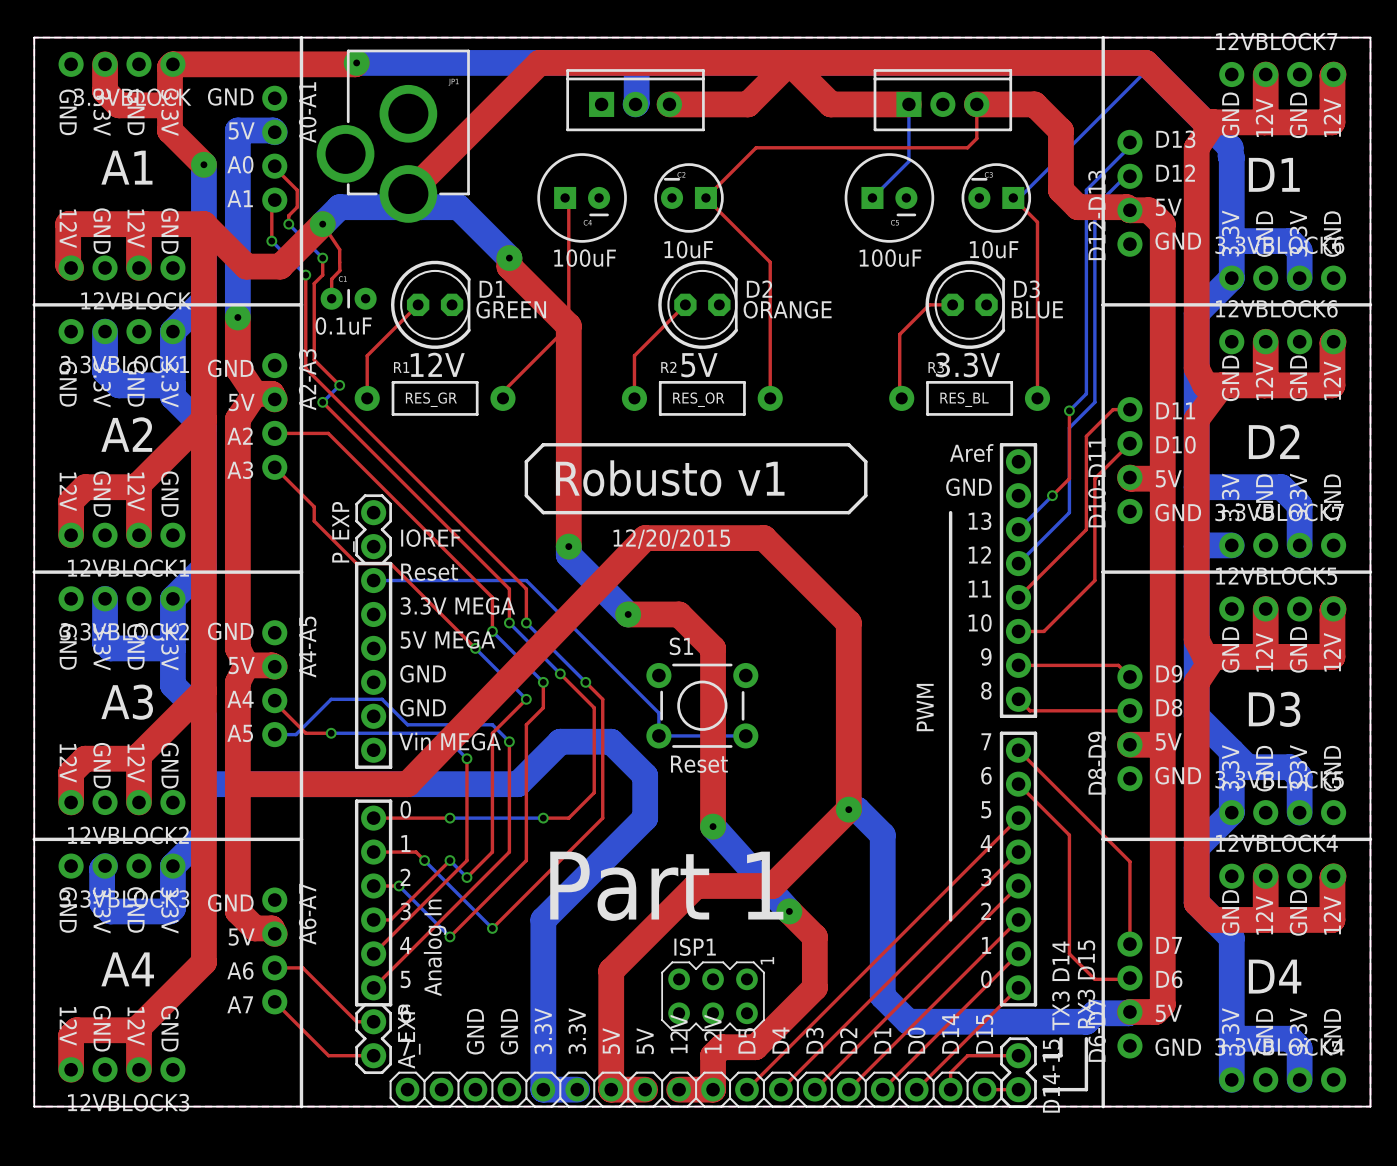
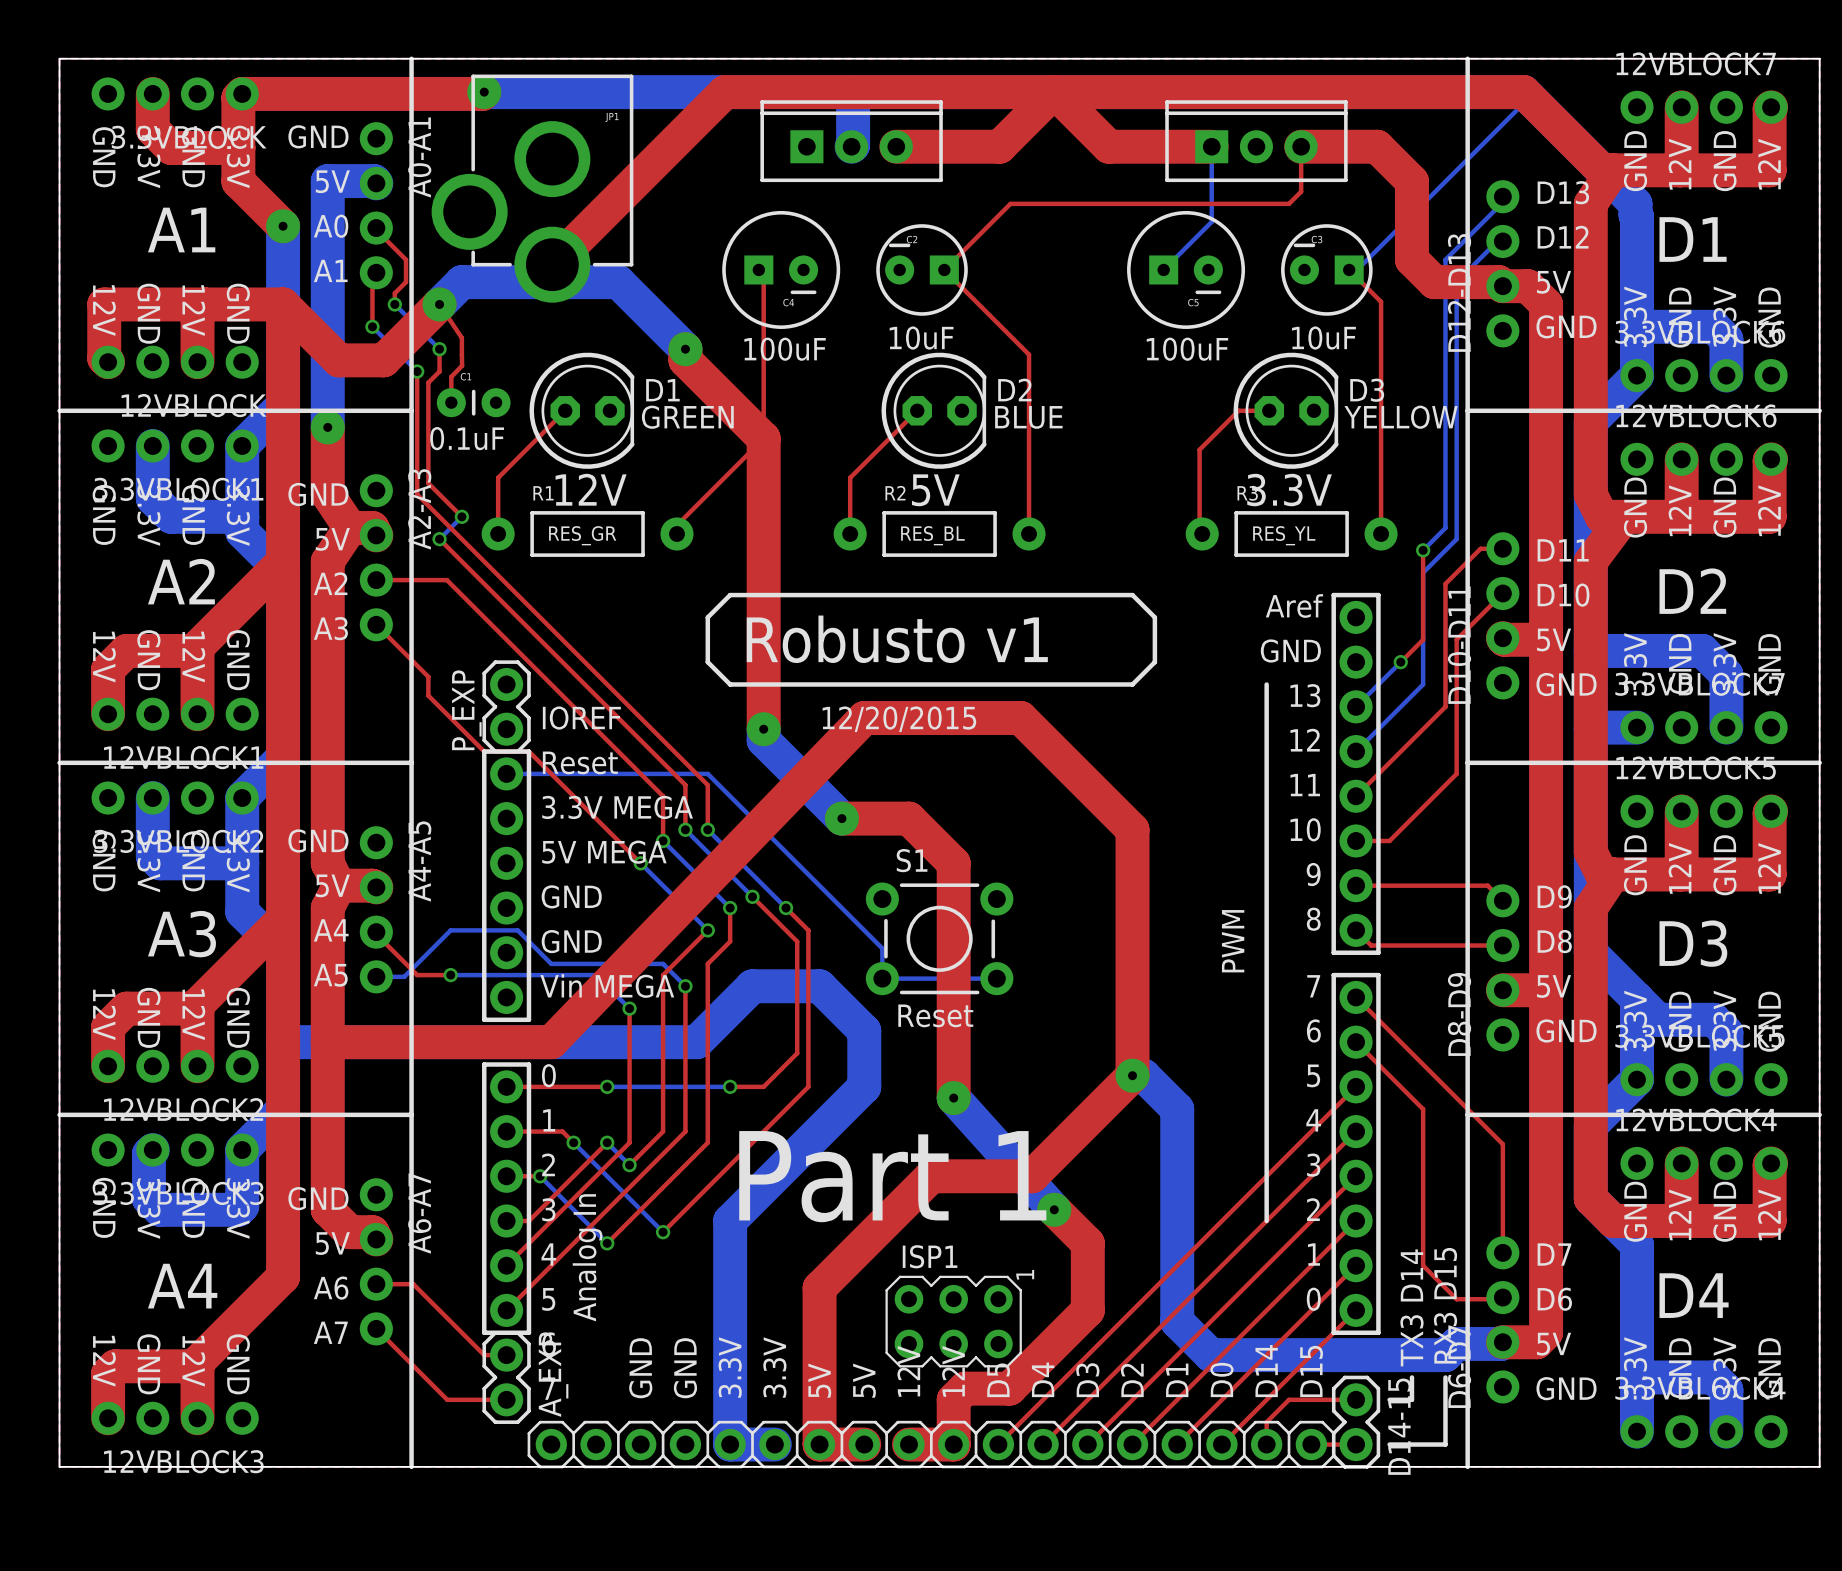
text: ORANGE (787, 309) -> BLUE (1028, 417)
text: BLUE (1037, 309) -> YELLOW (1401, 417)
R2 value: RES_OR (698, 399) -> RES_BL (932, 535)
R3 value: RES_BL (964, 399) -> RES_YL (1284, 535)

